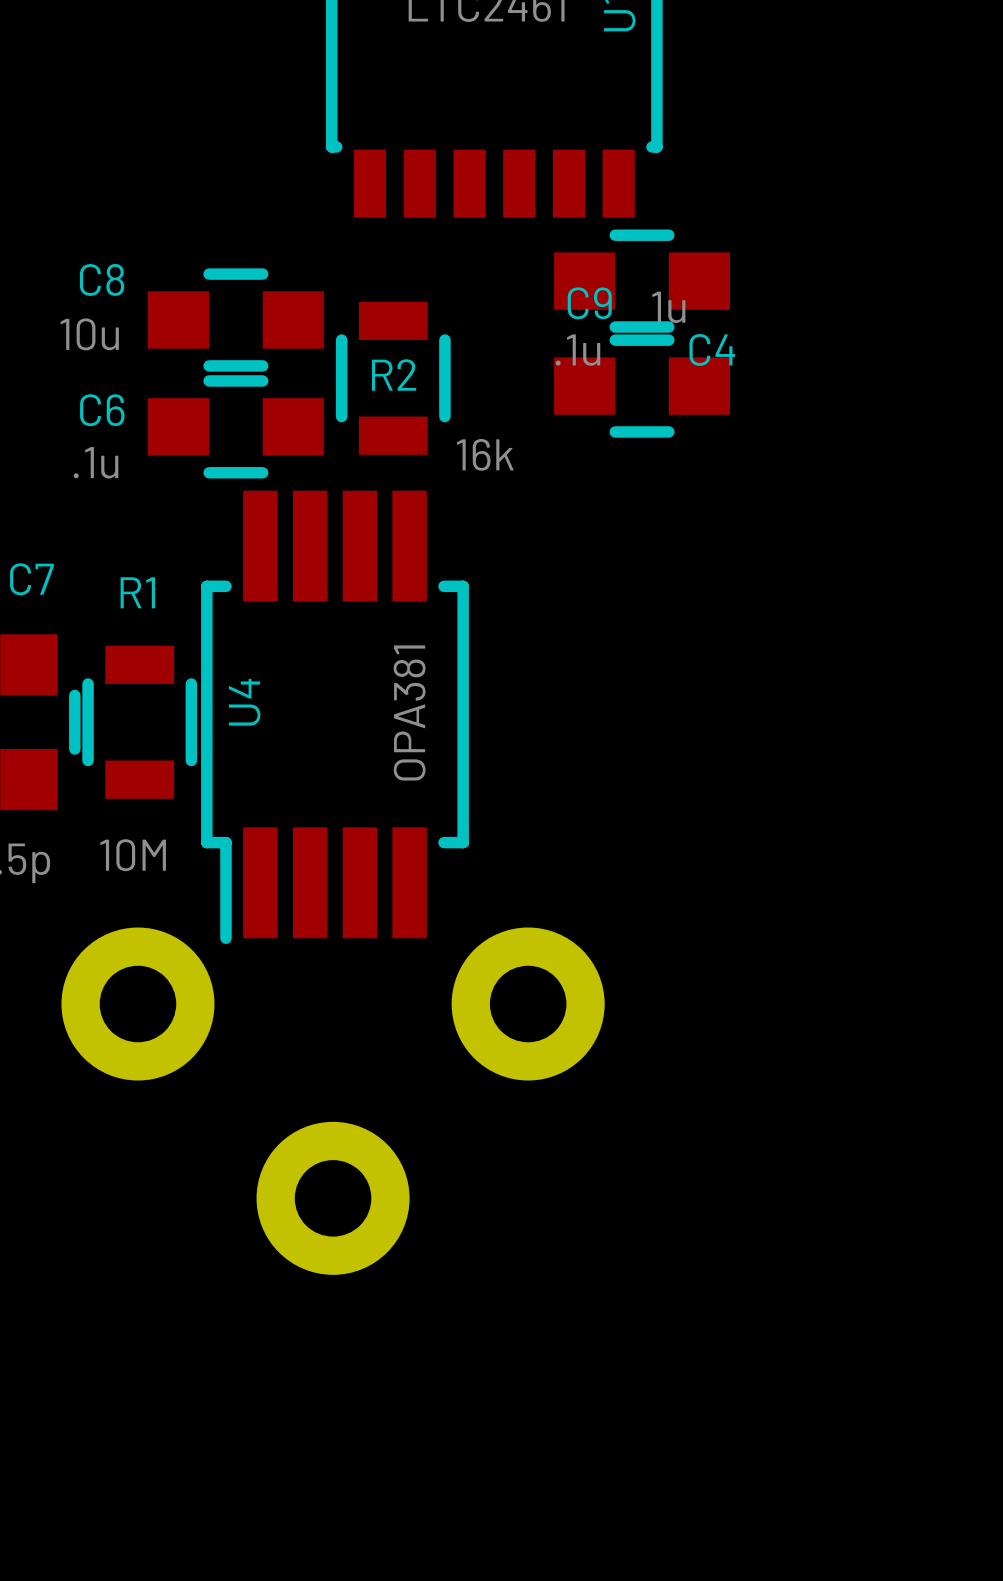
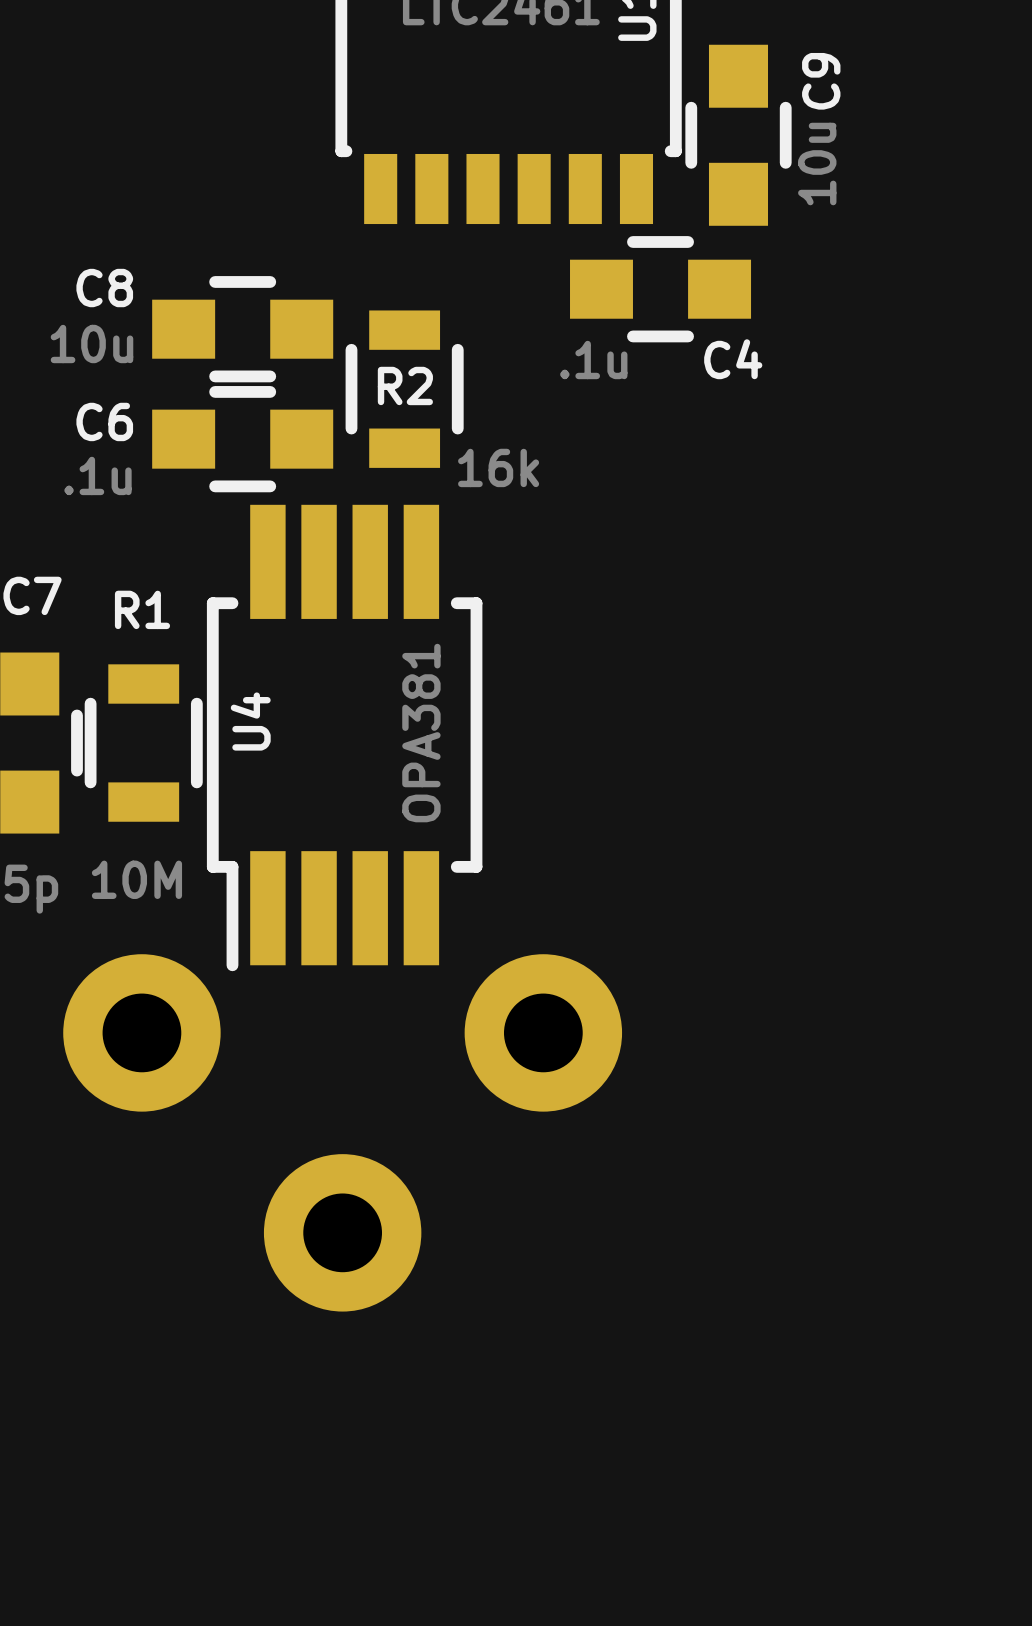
C9 value: 1u (668, 307) -> 10u (817, 164)
C9 rotation: 0° (642, 386) -> 90° clockwise (738, 135)
C9 position: (642, 386) -> (738, 135)

